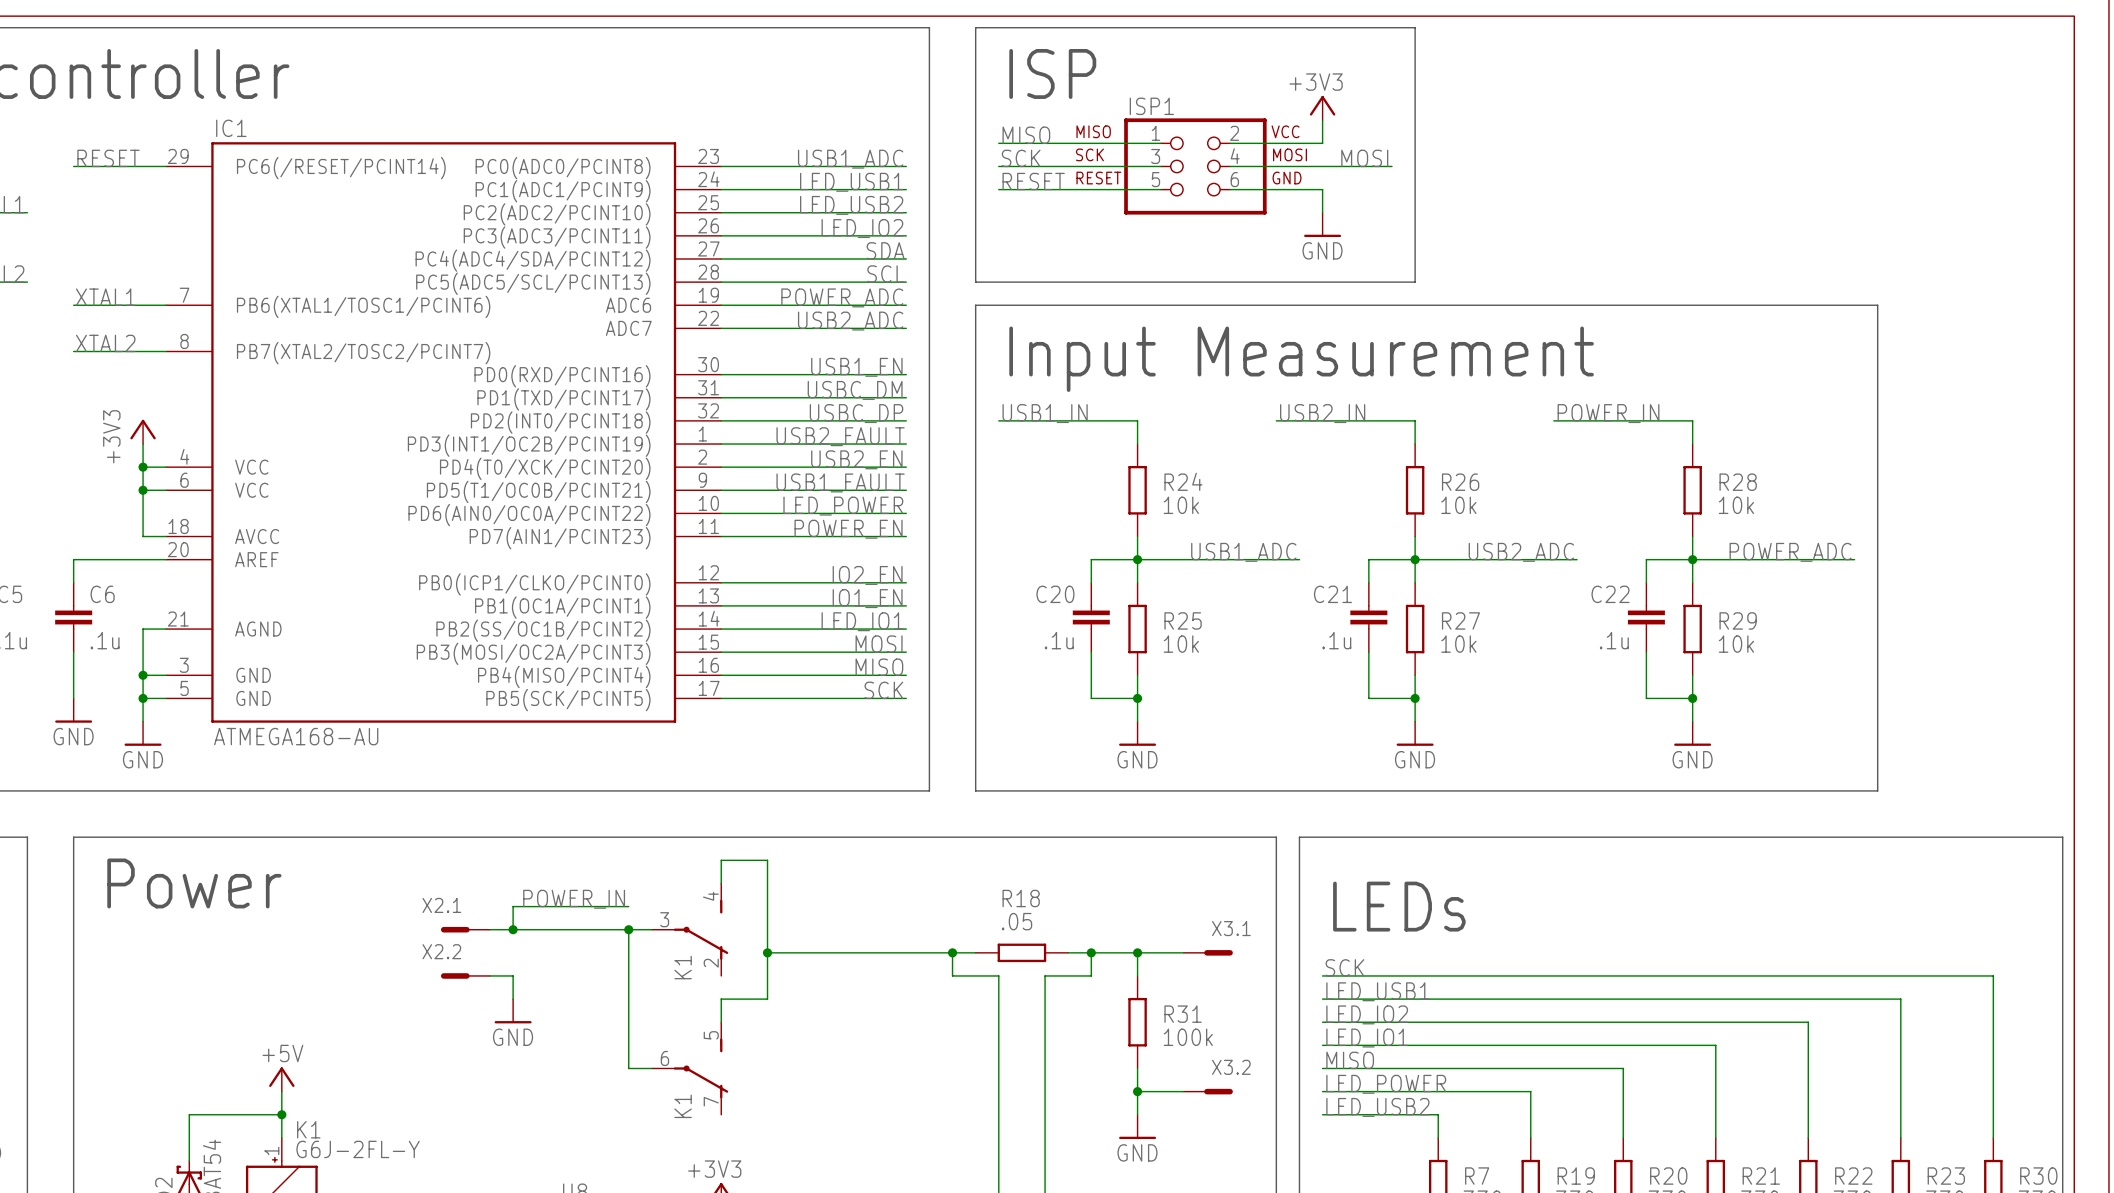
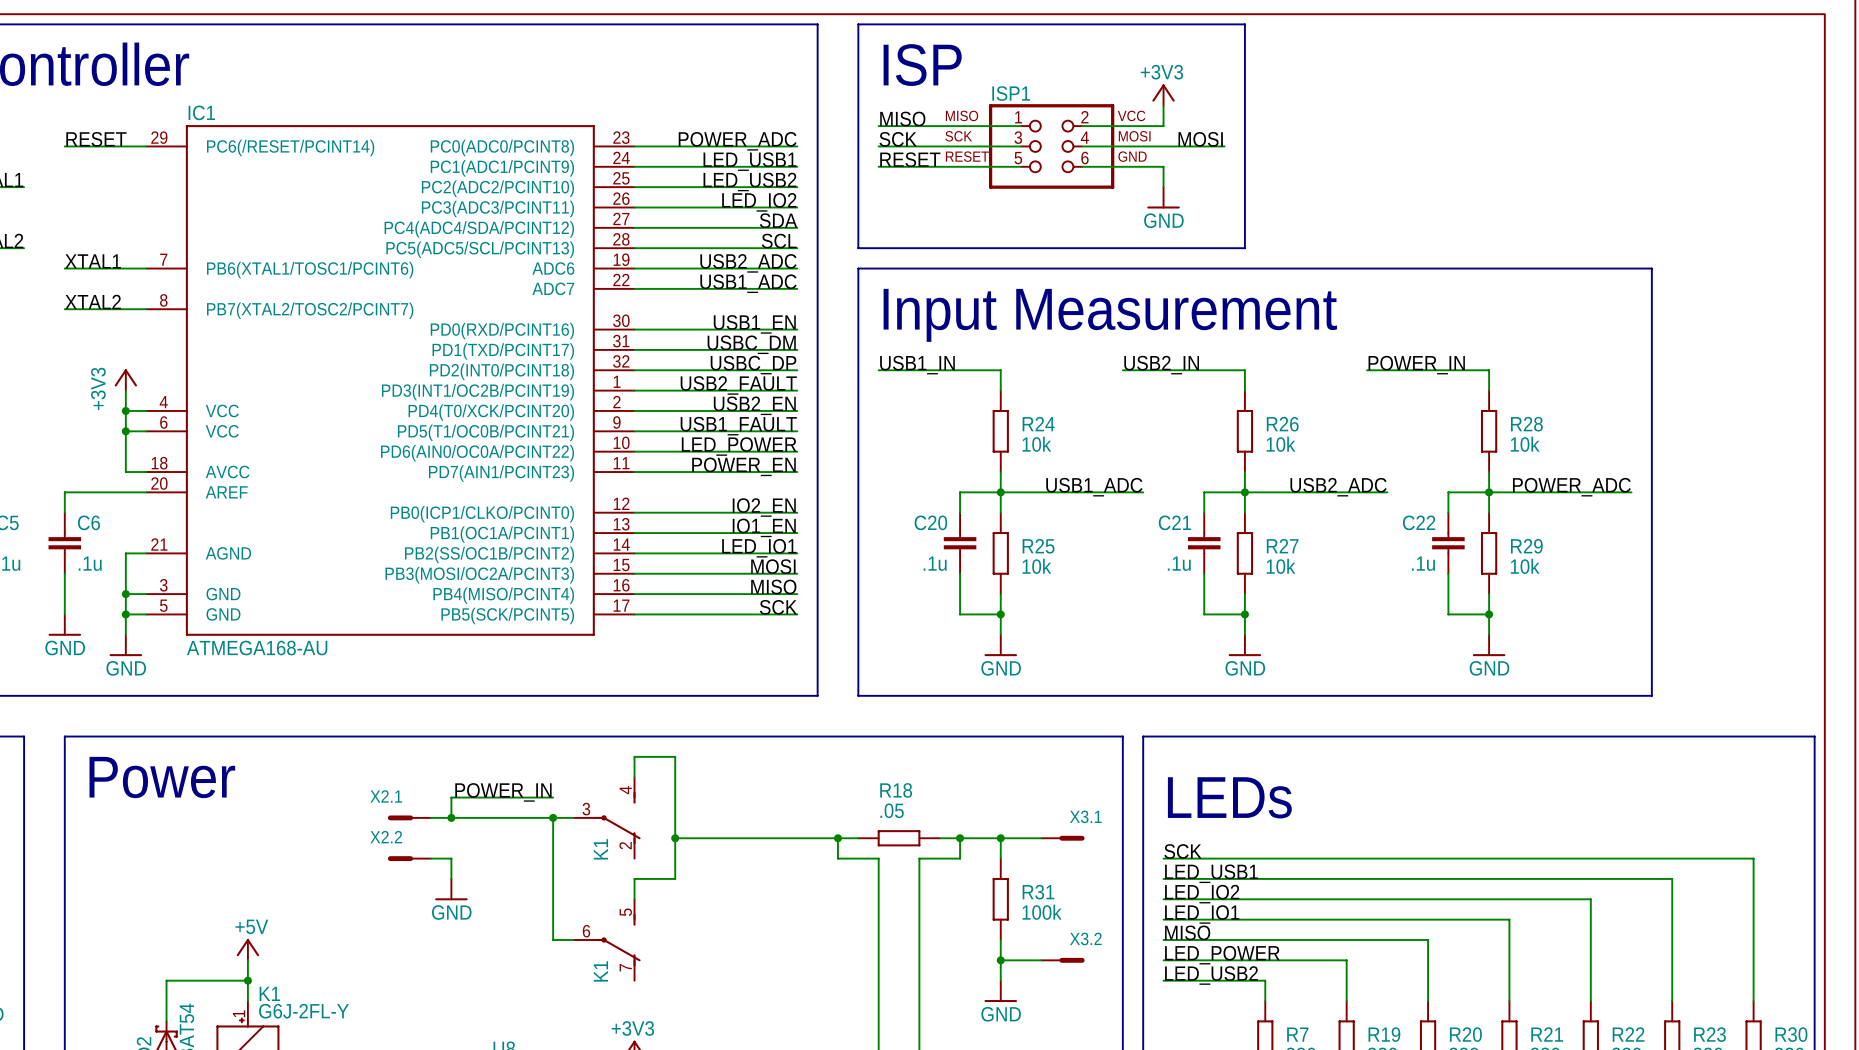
label: USB1_ADC (850, 159) -> POWER_ADC (737, 141)
label: POWER_ADC (842, 297) -> USB2_ADC (748, 263)
label: USB2_ADC (850, 321) -> USB1_ADC (748, 283)

